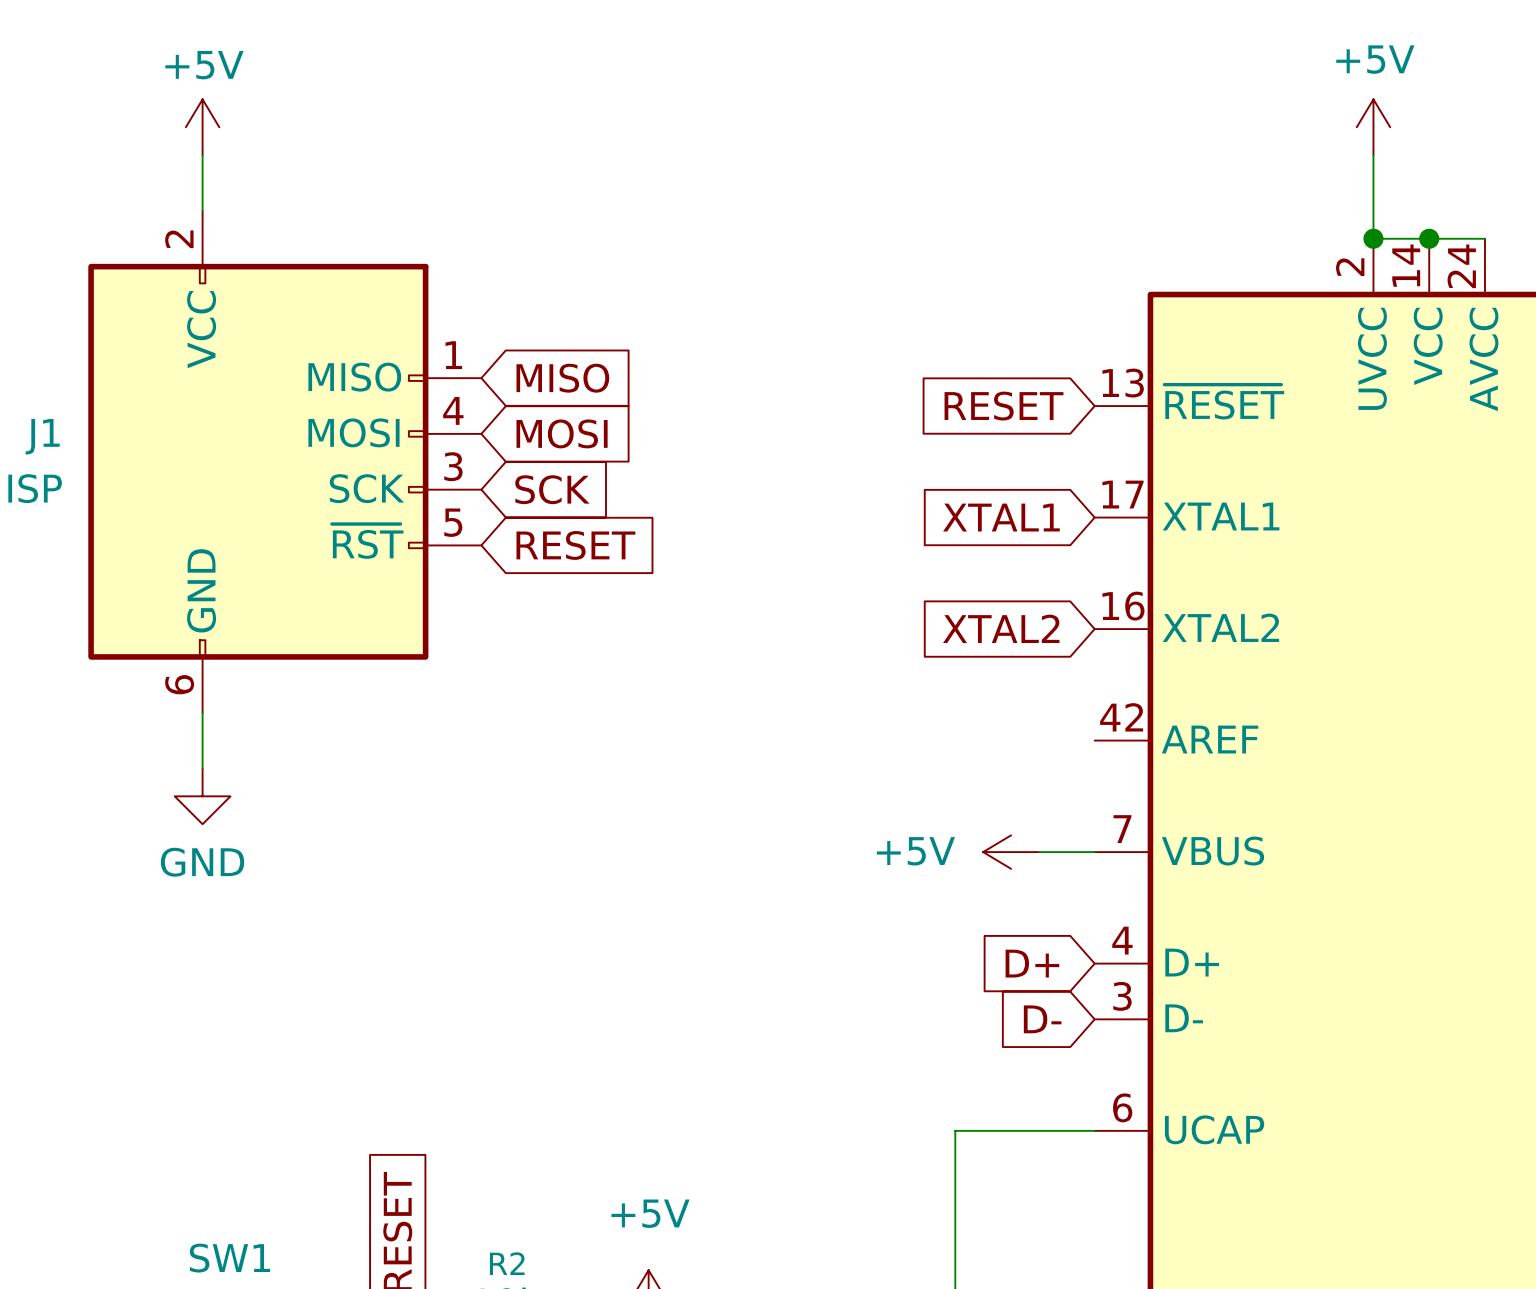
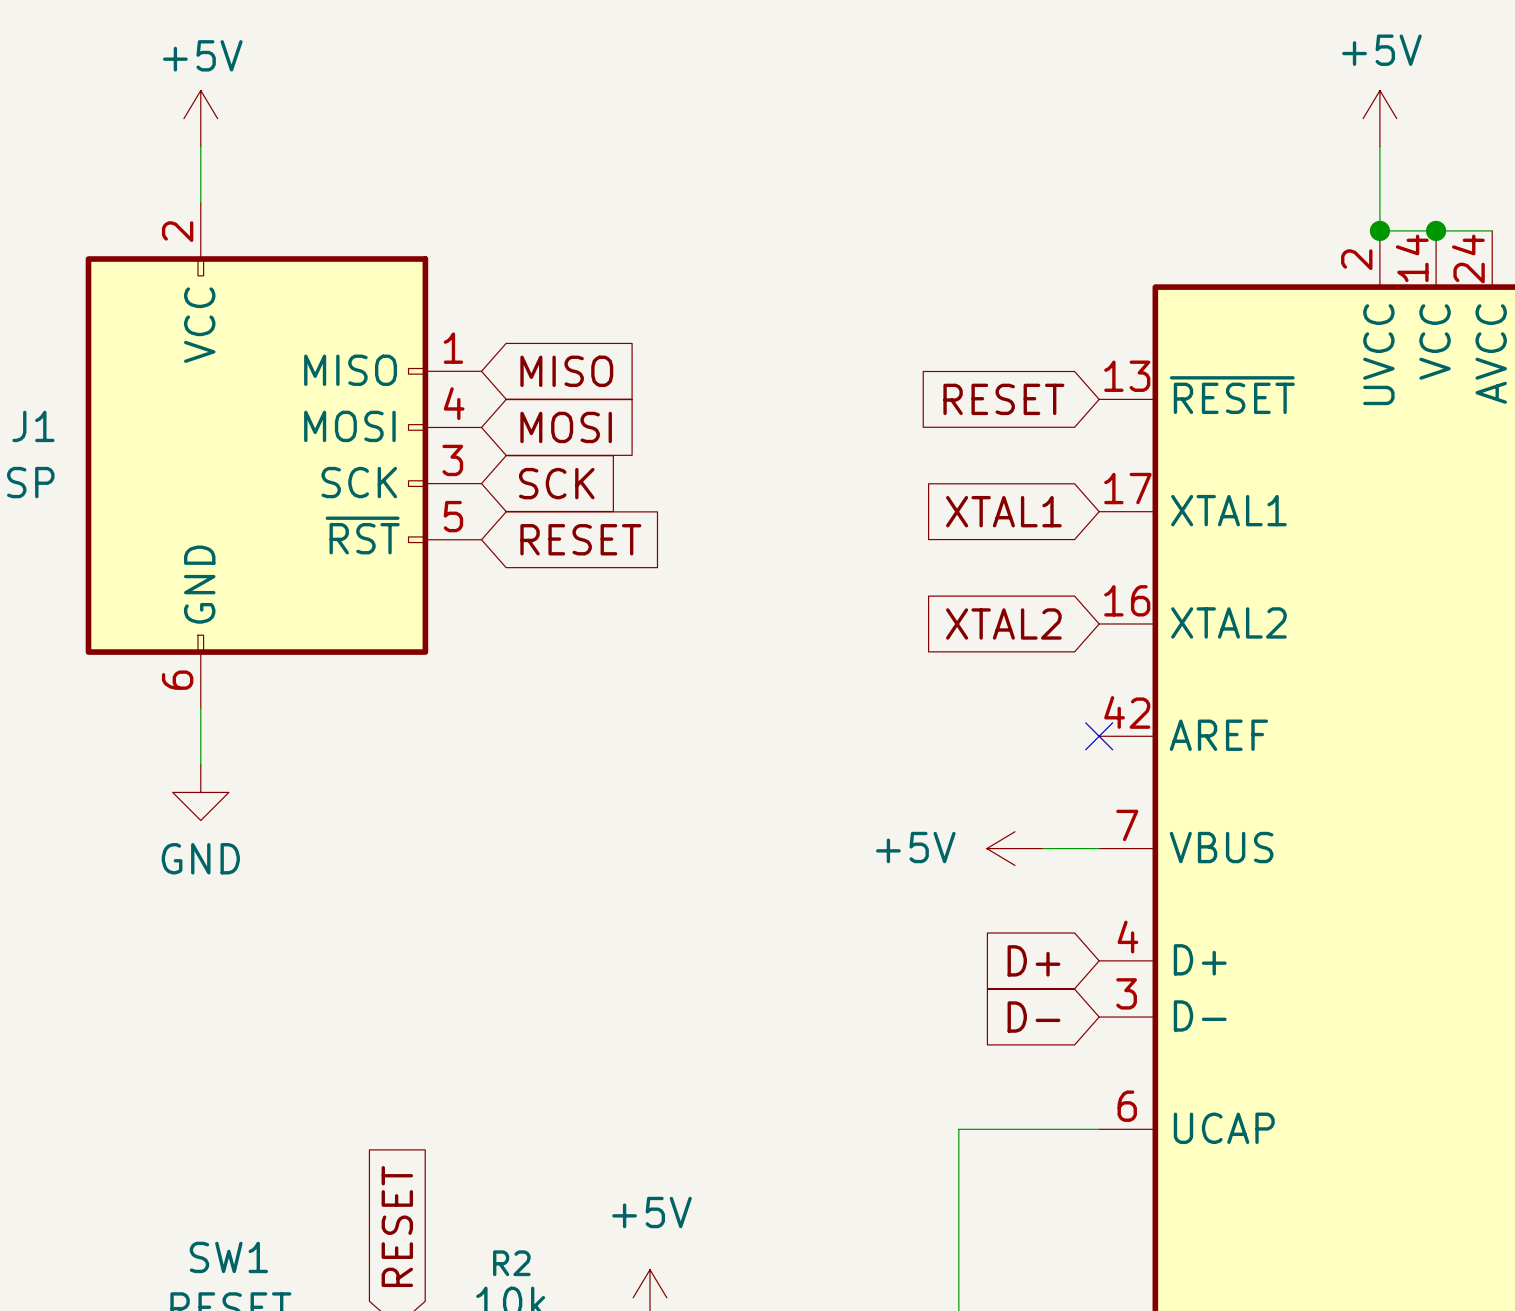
no-connect mark: none -> (1099, 736)

